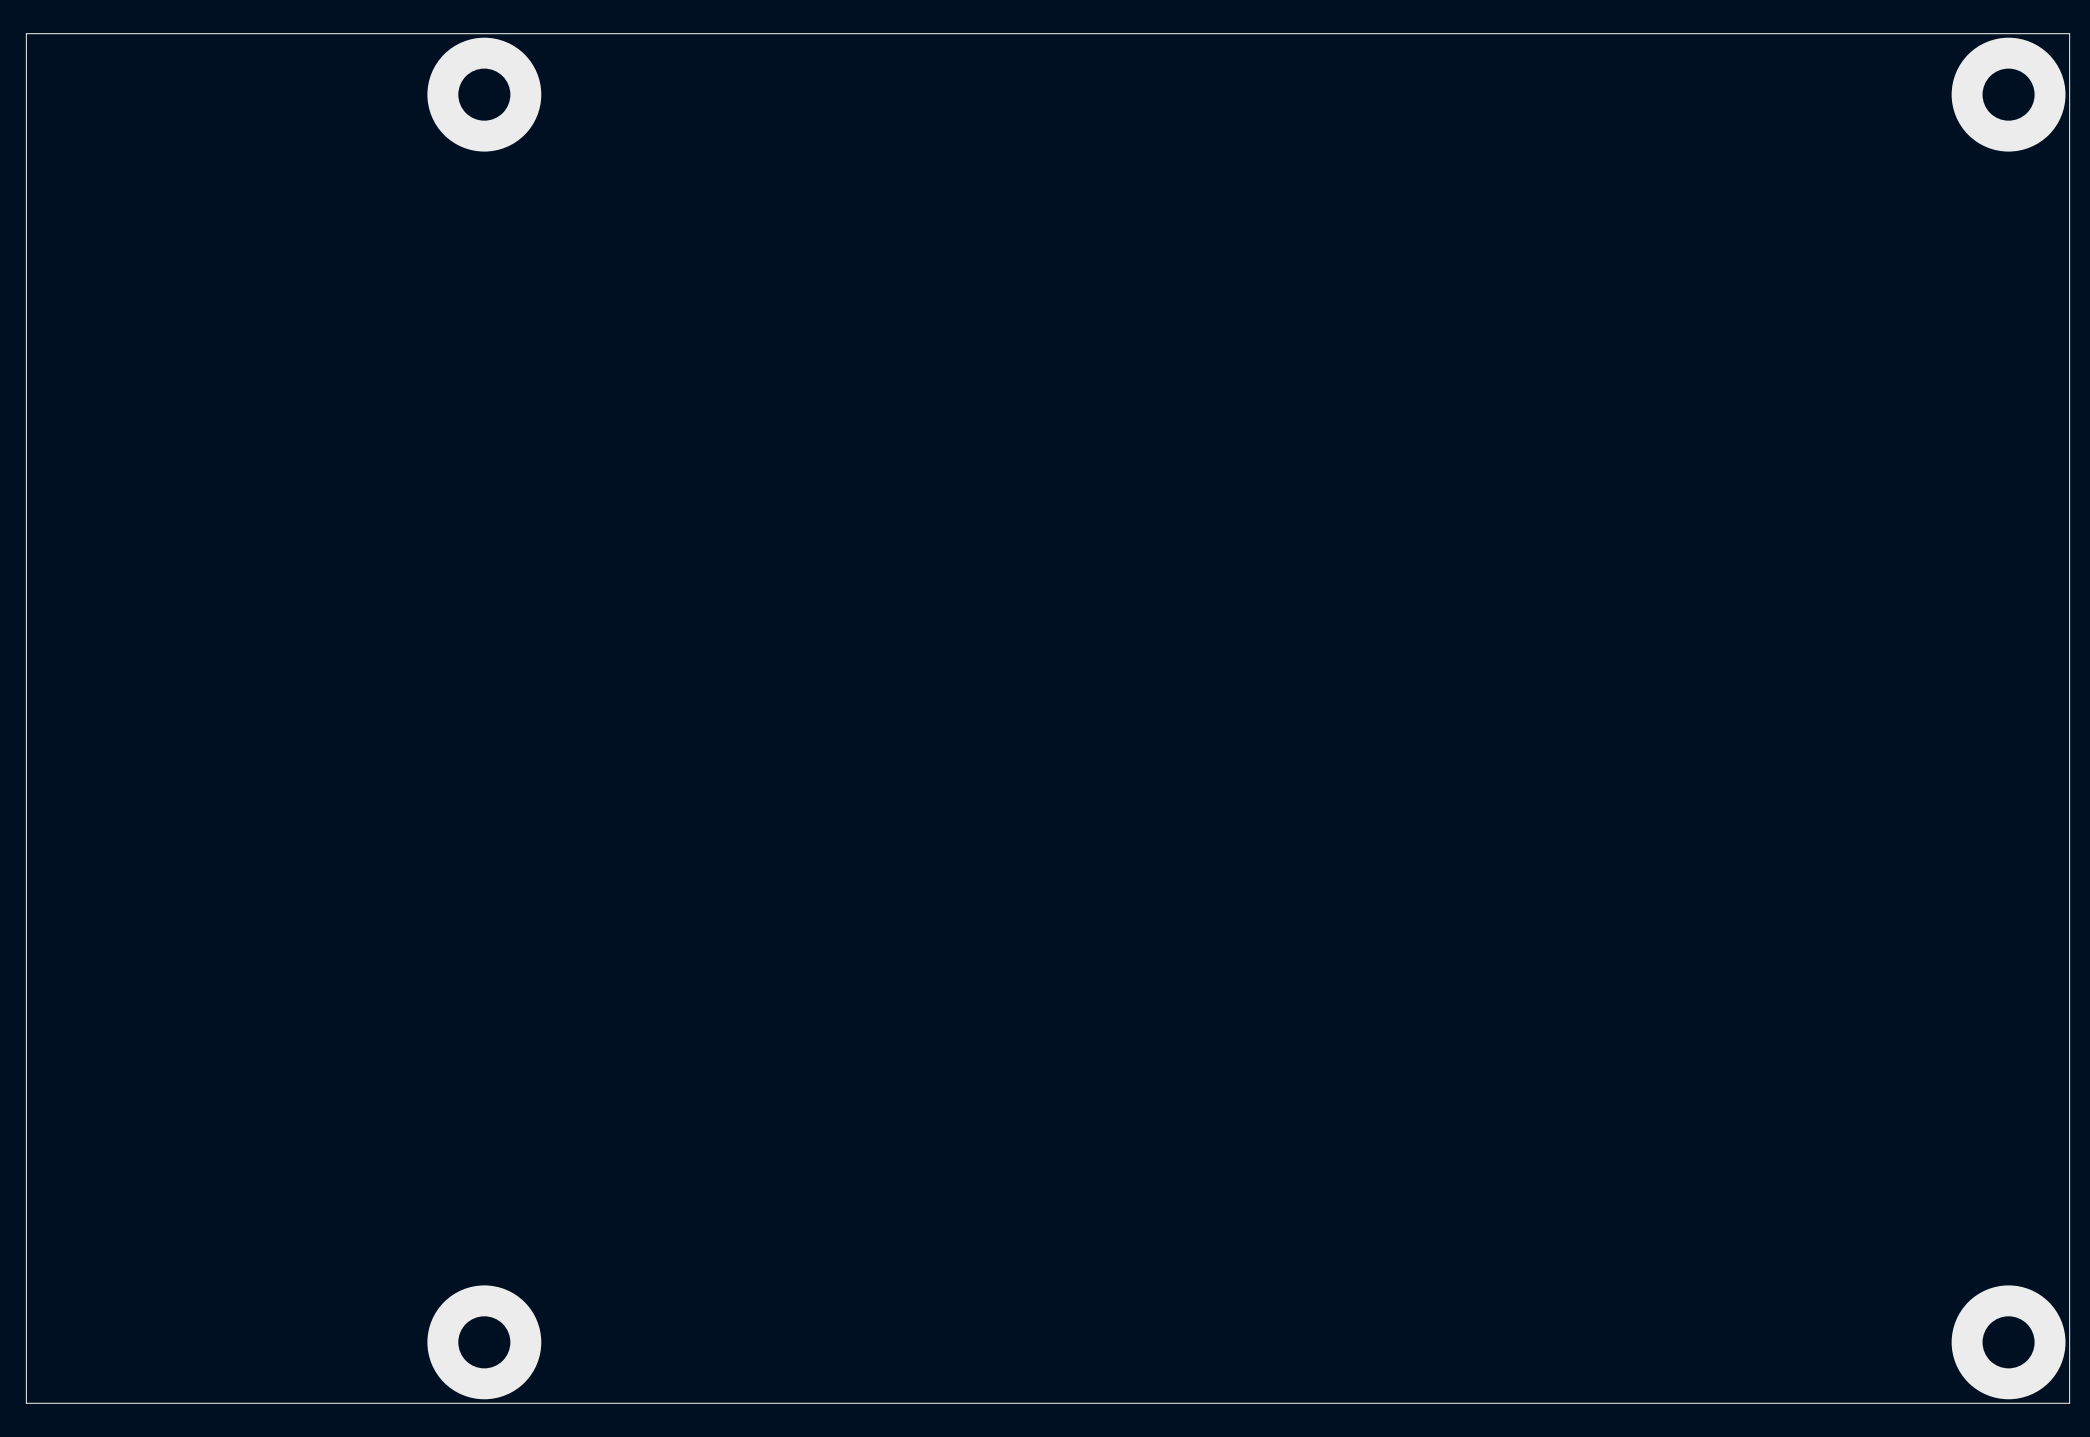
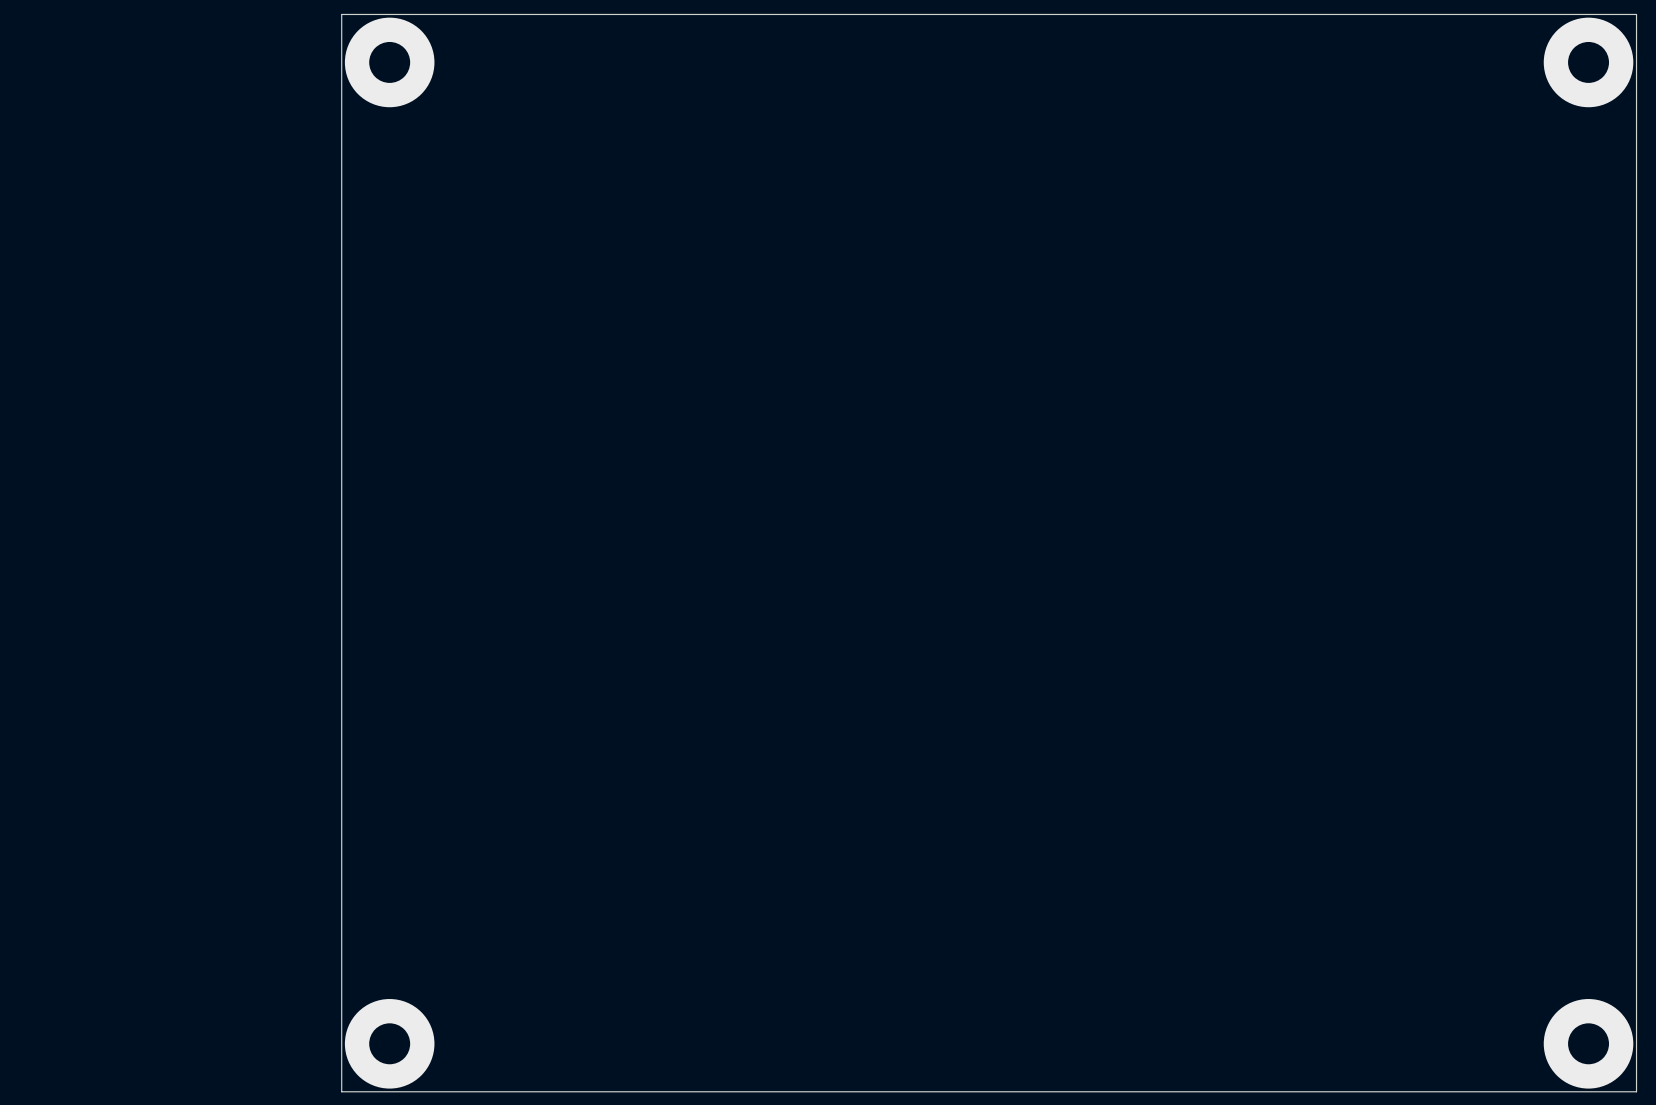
board edge: (423, 33) (26, 33) (26, 1403) (423, 1403) -> (341, 14) (341, 1091)

